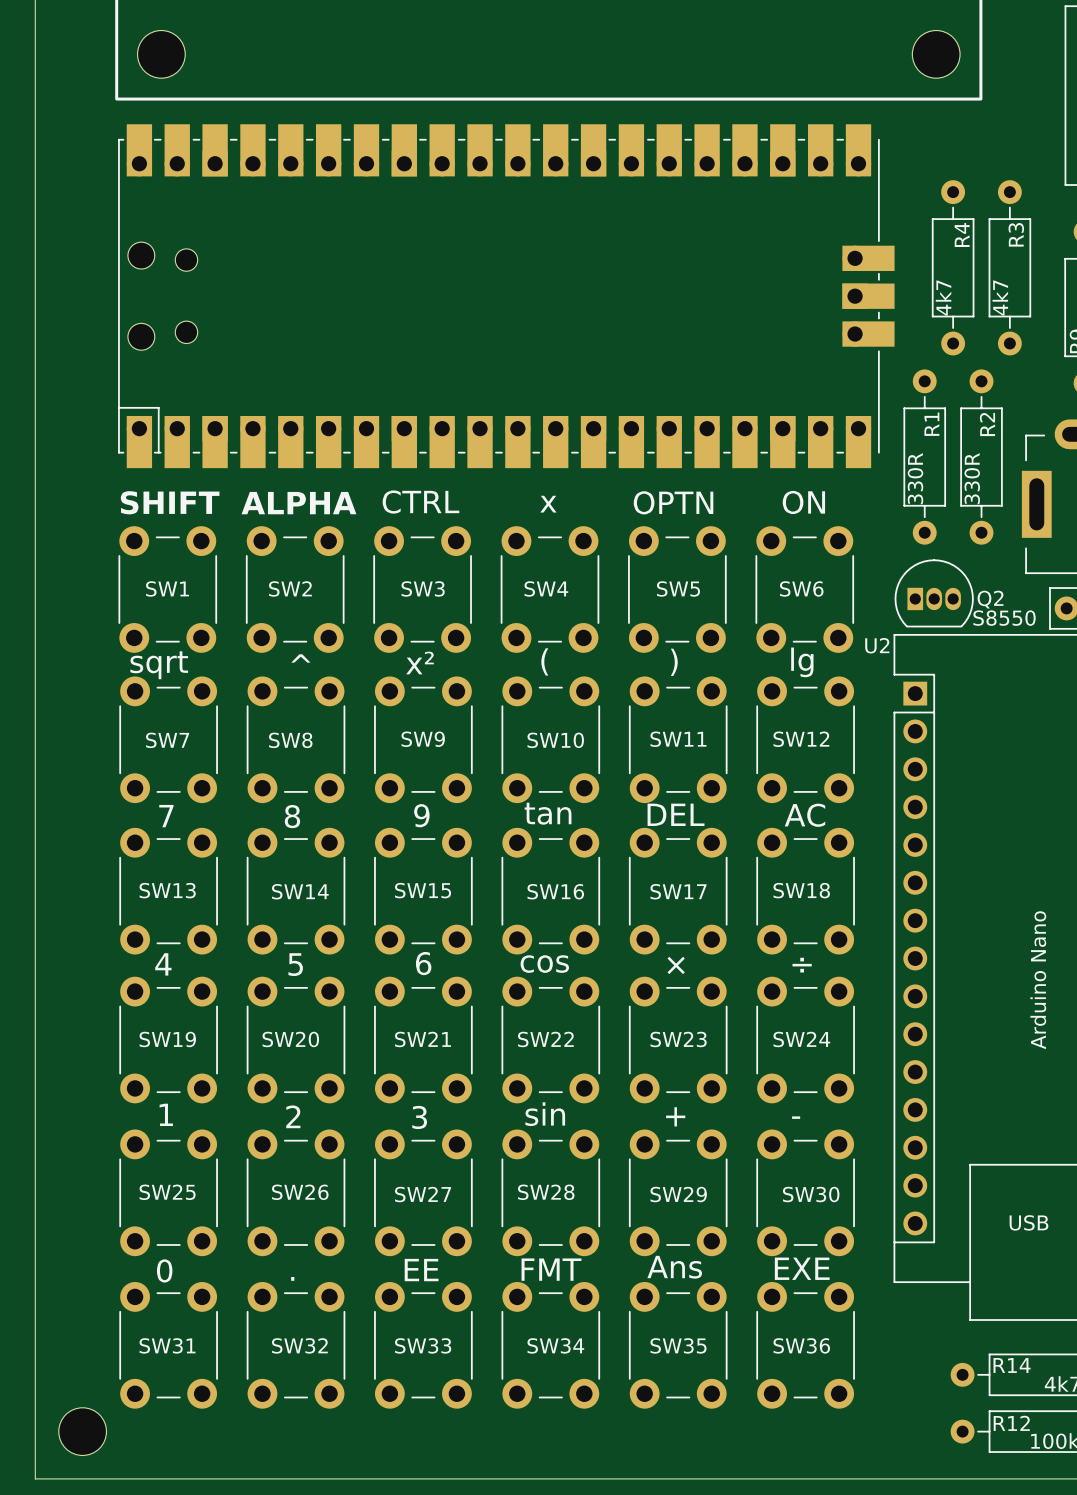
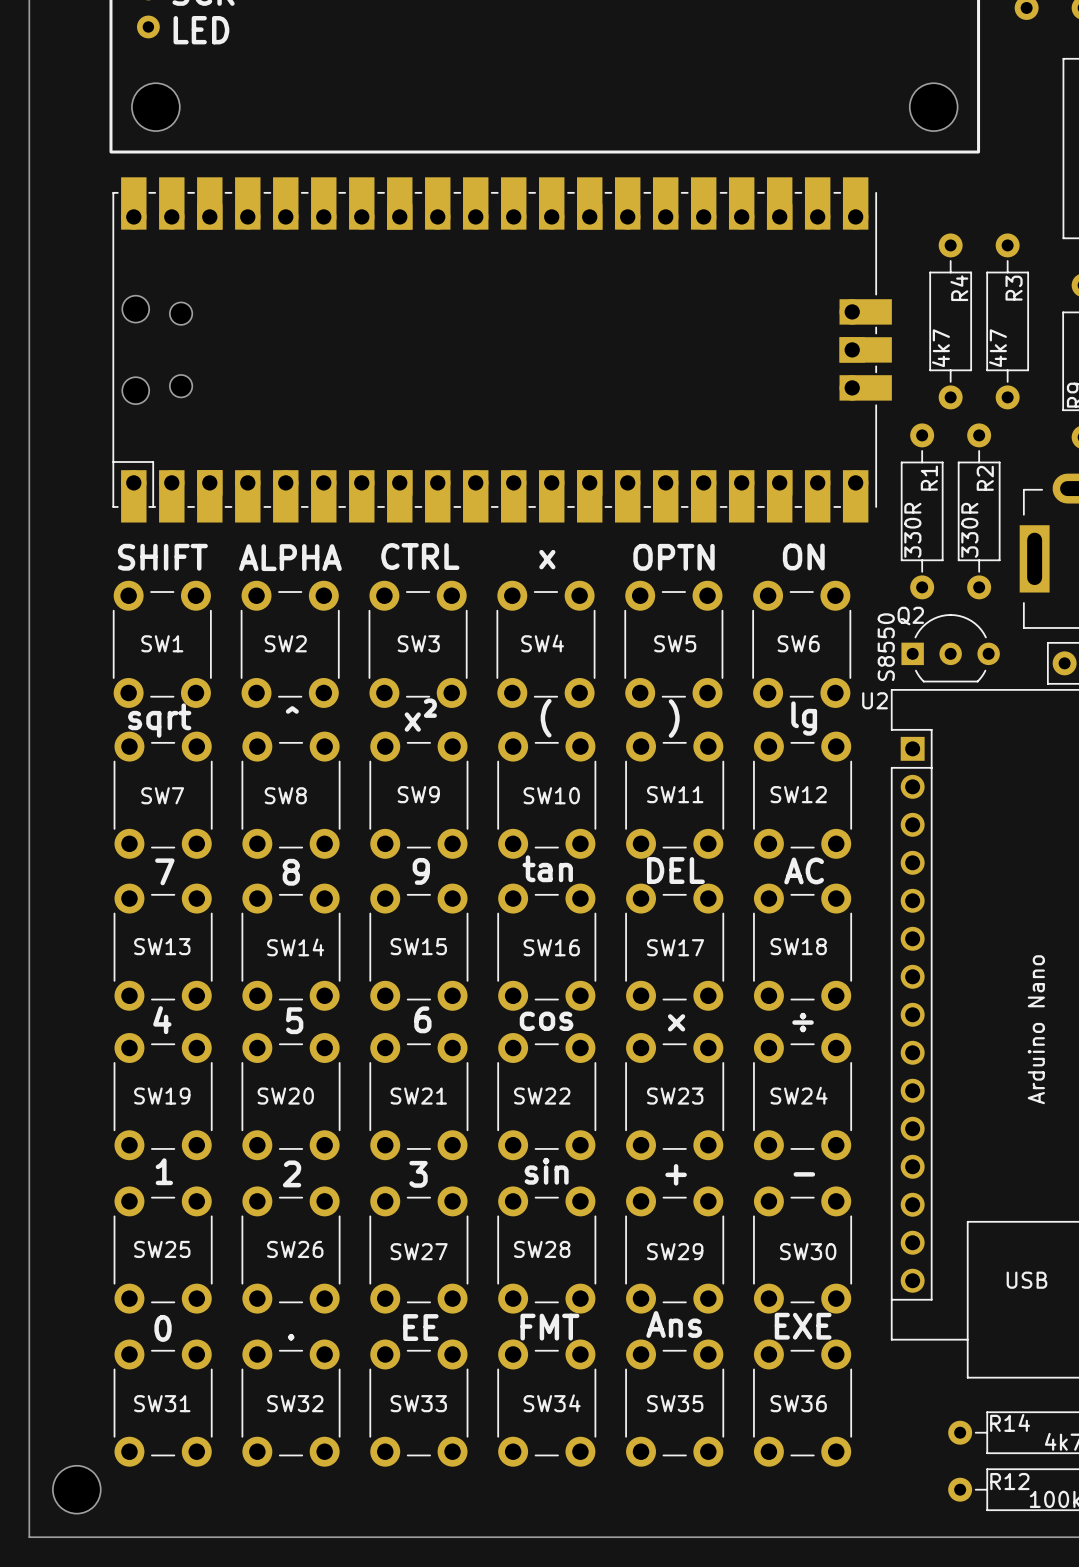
Q2 footprint: [894, 559, 974, 628] -> [901, 614, 1000, 683]
Q2 name position: Q2 (990, 599) -> Q2 (910, 616)
text rotation: 0° (1004, 618) -> 90° counterclockwise (886, 647)
text position: S8550 (1004, 618) -> S8550 (886, 647)

